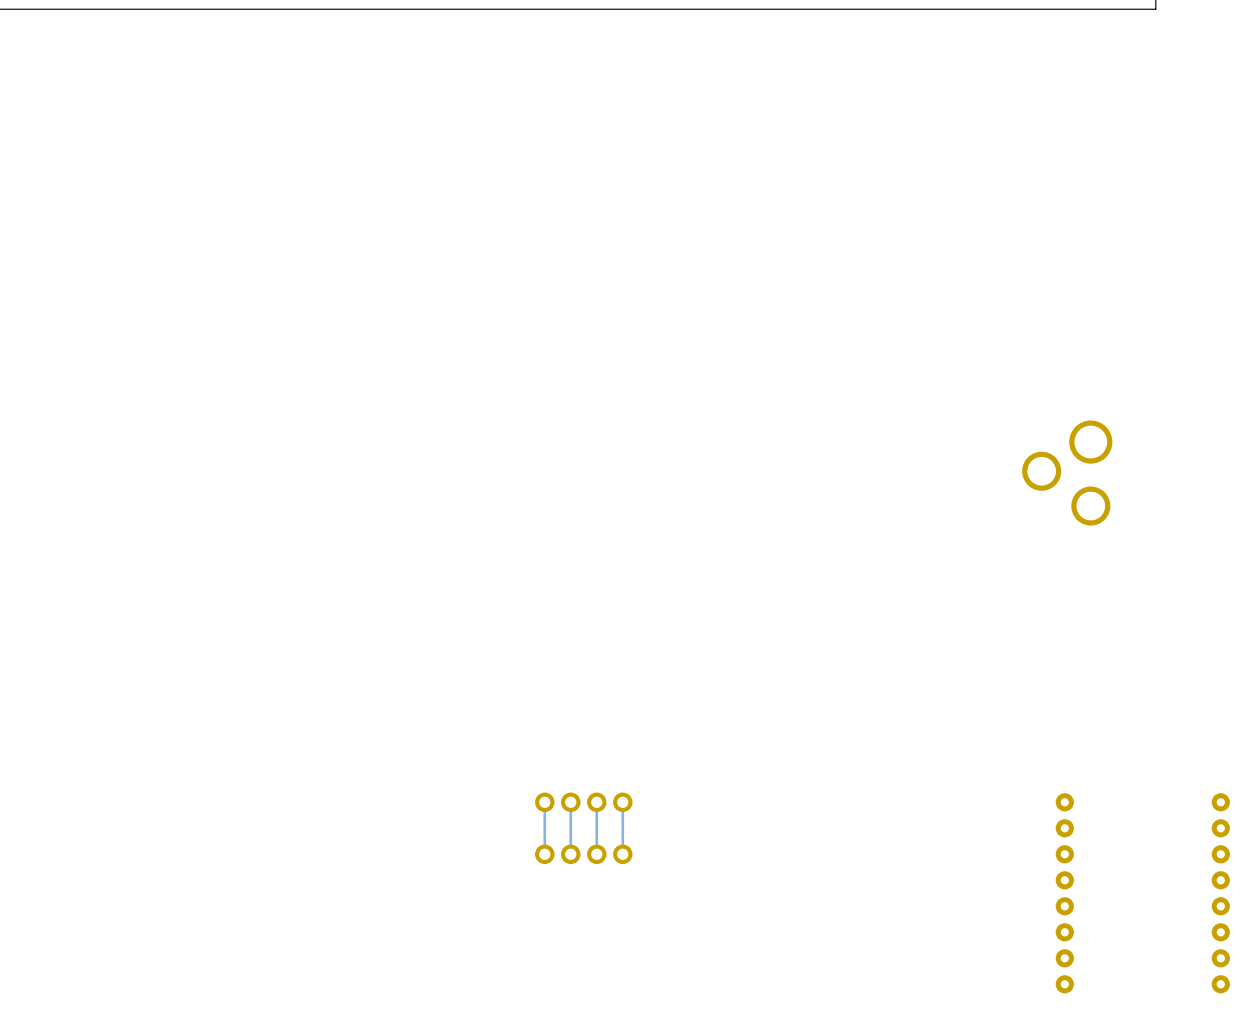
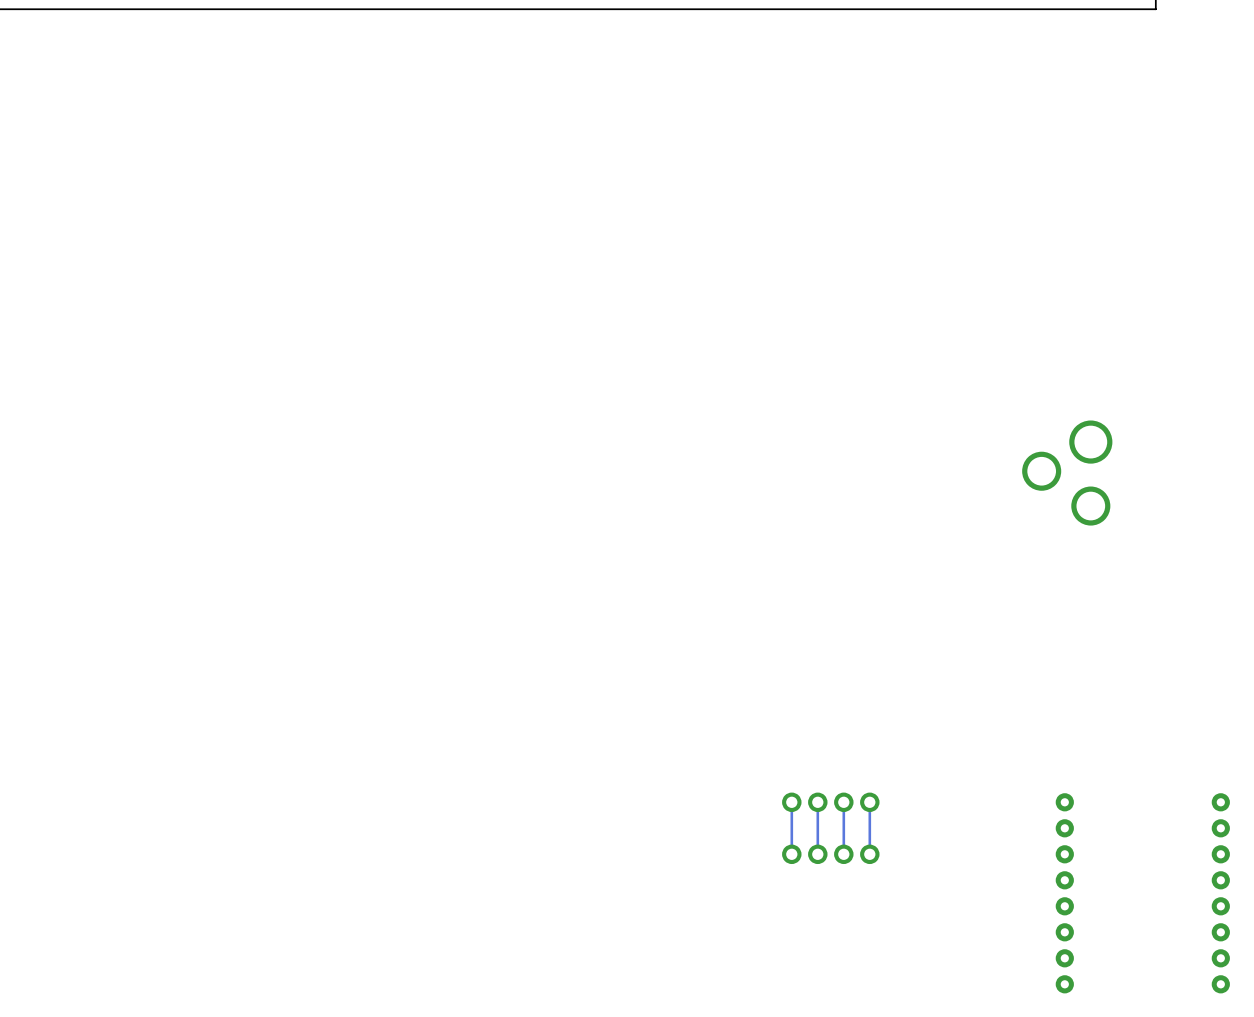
part position: (583, 828) -> (830, 828)

